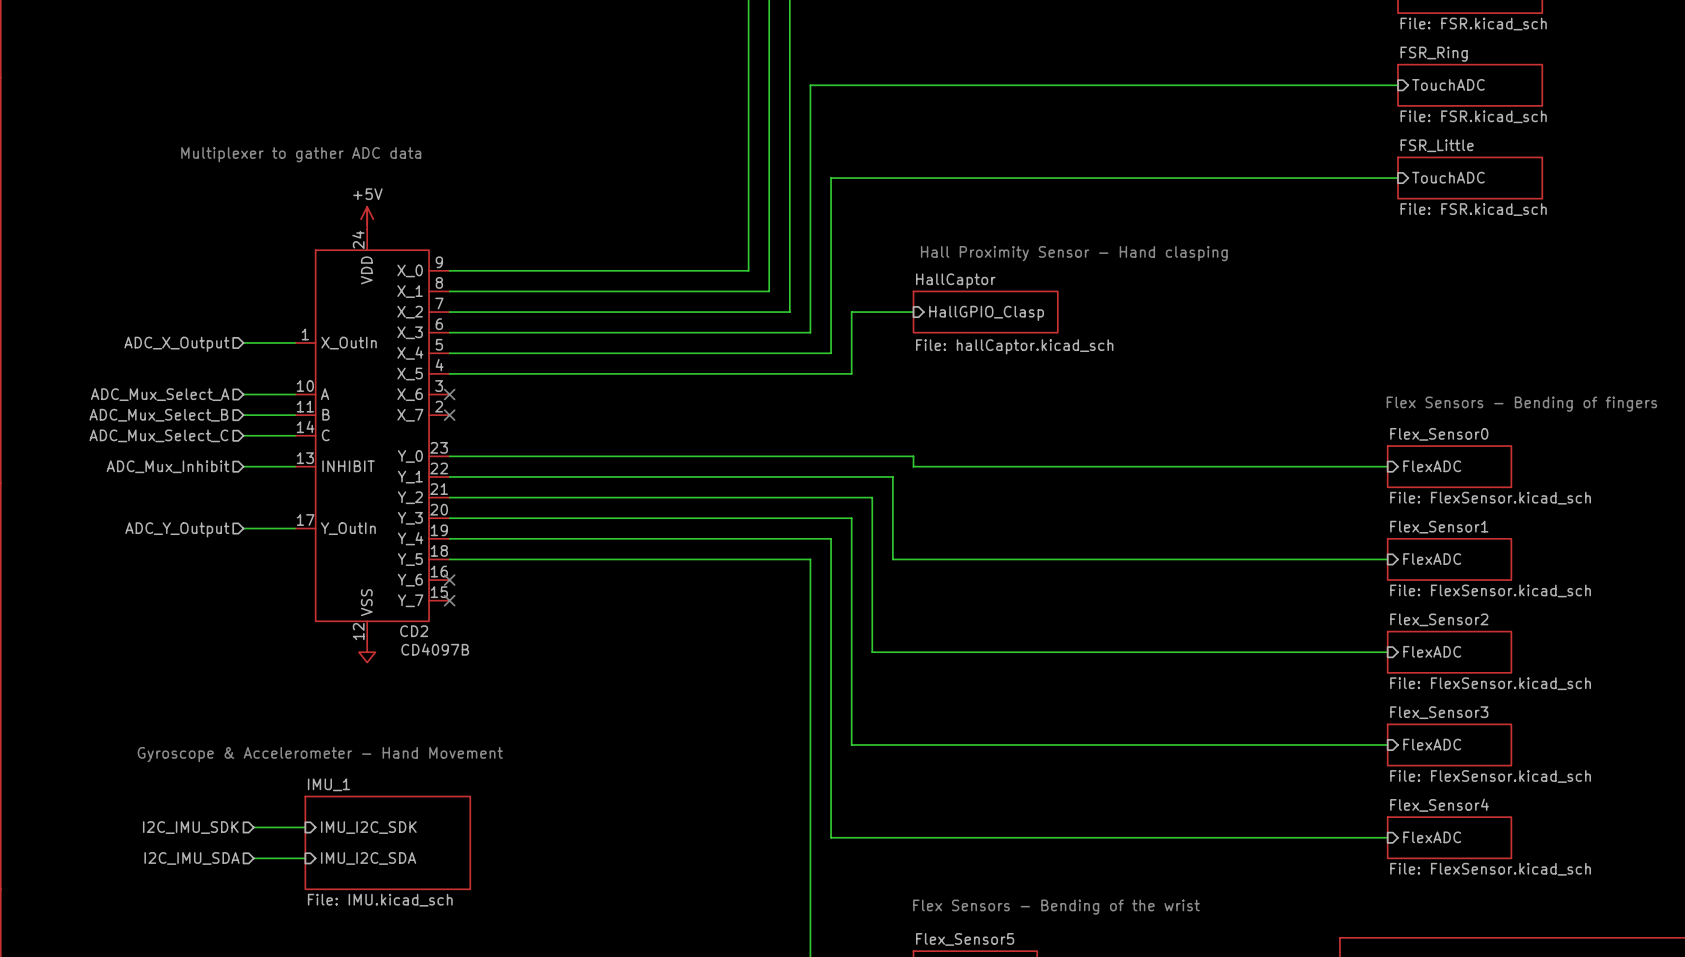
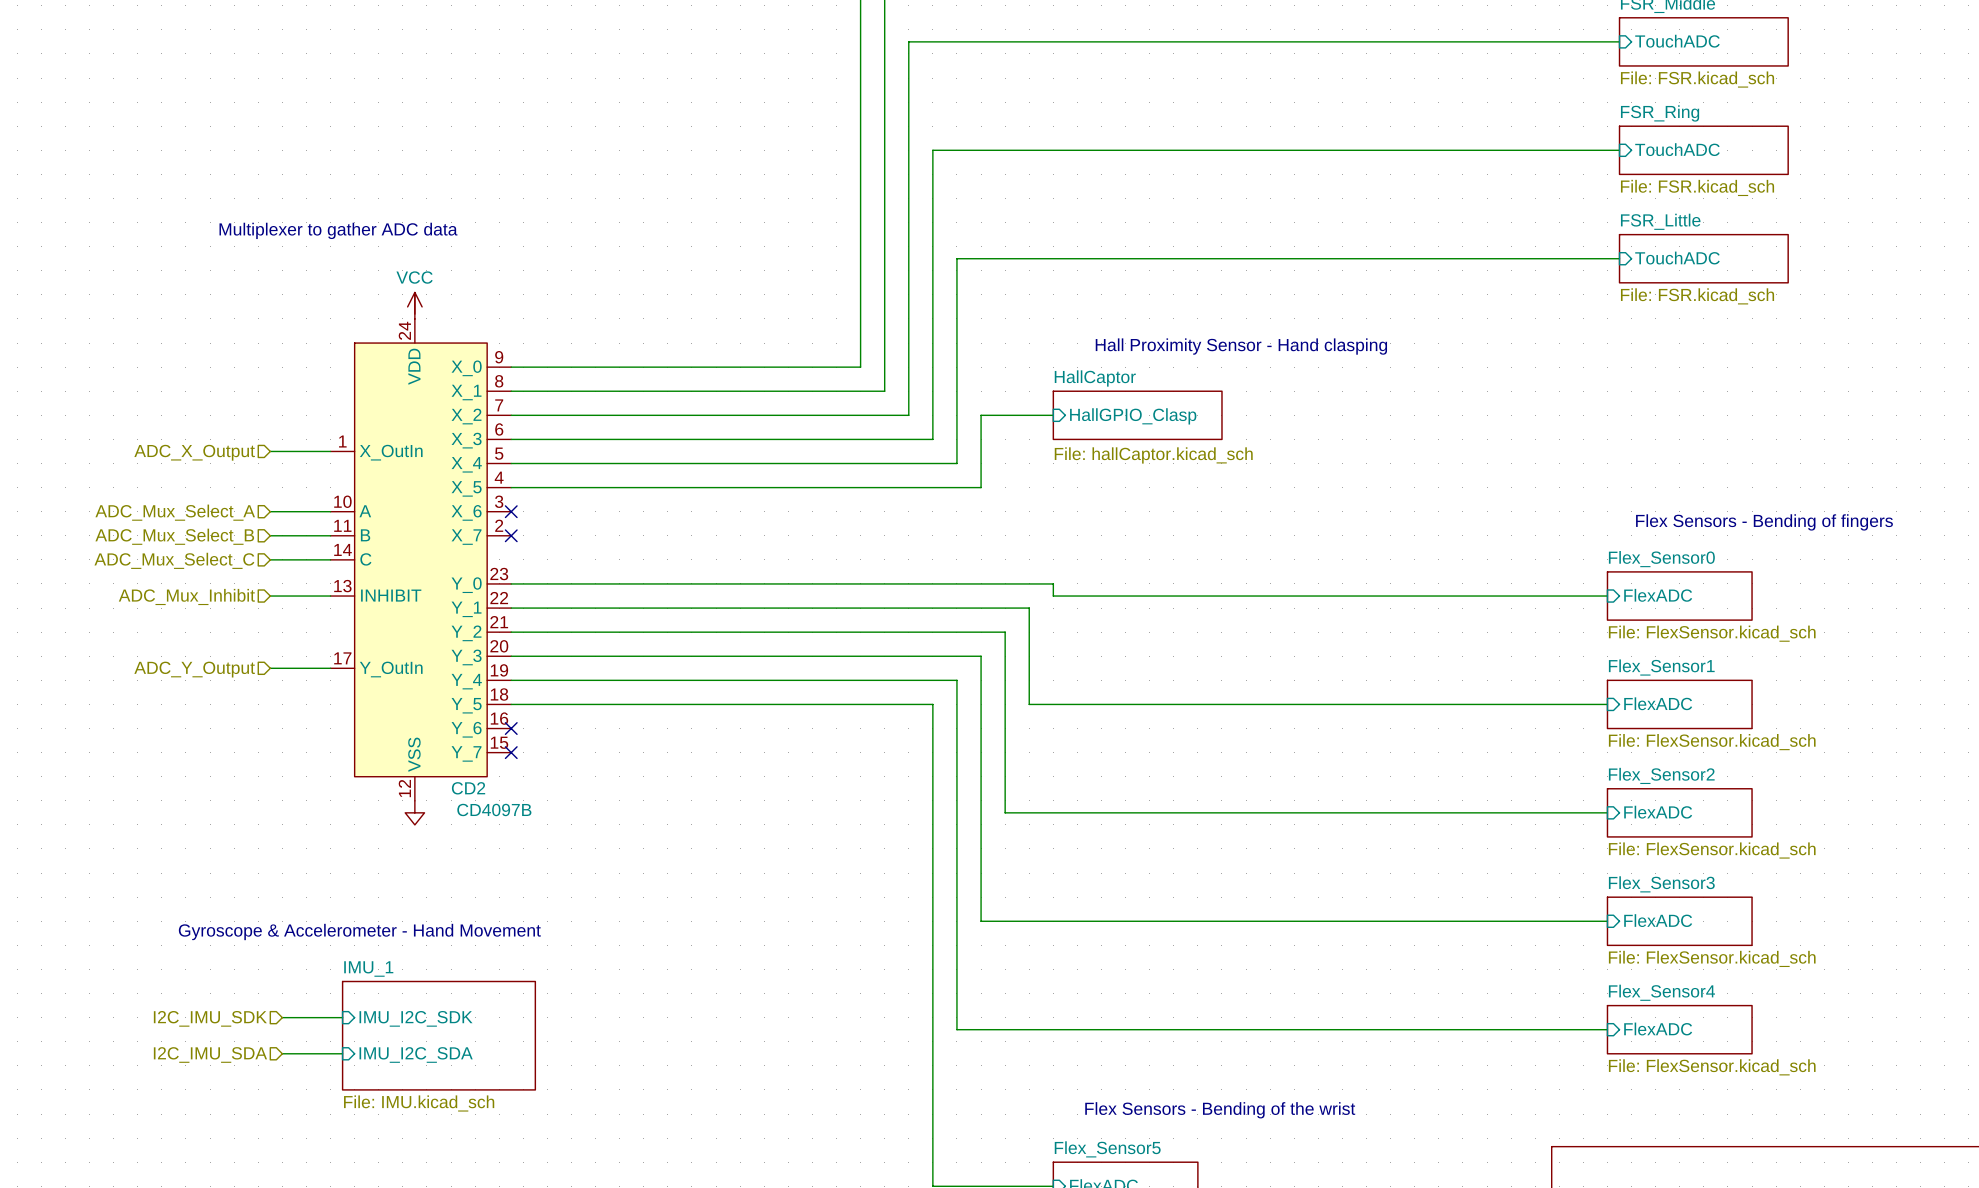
power symbol: +5V (367, 218) -> VCC (414, 305)

